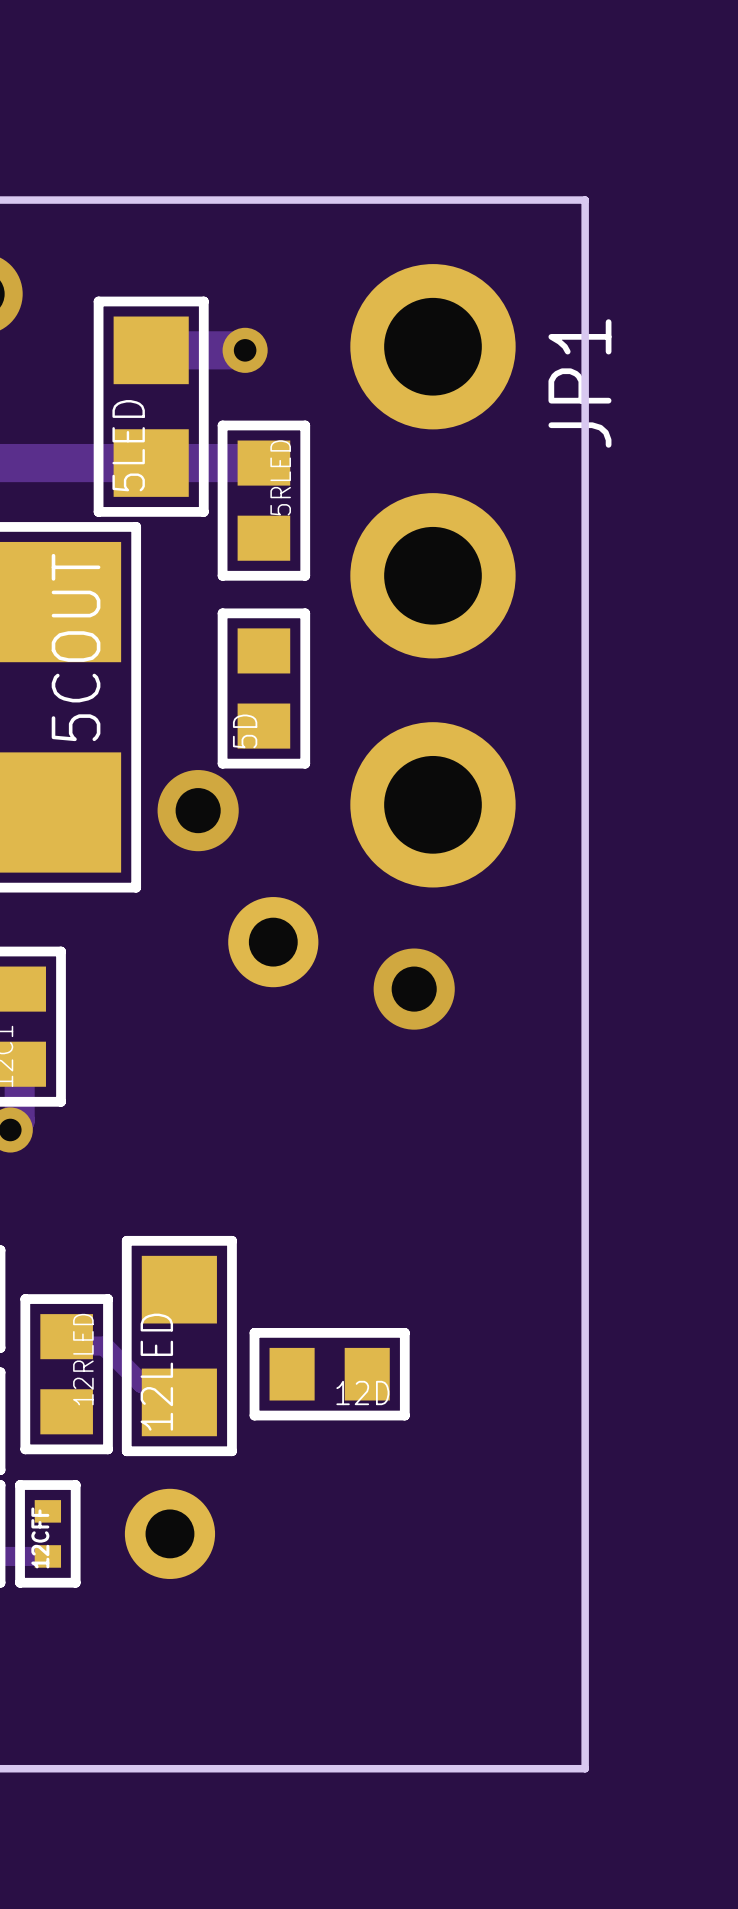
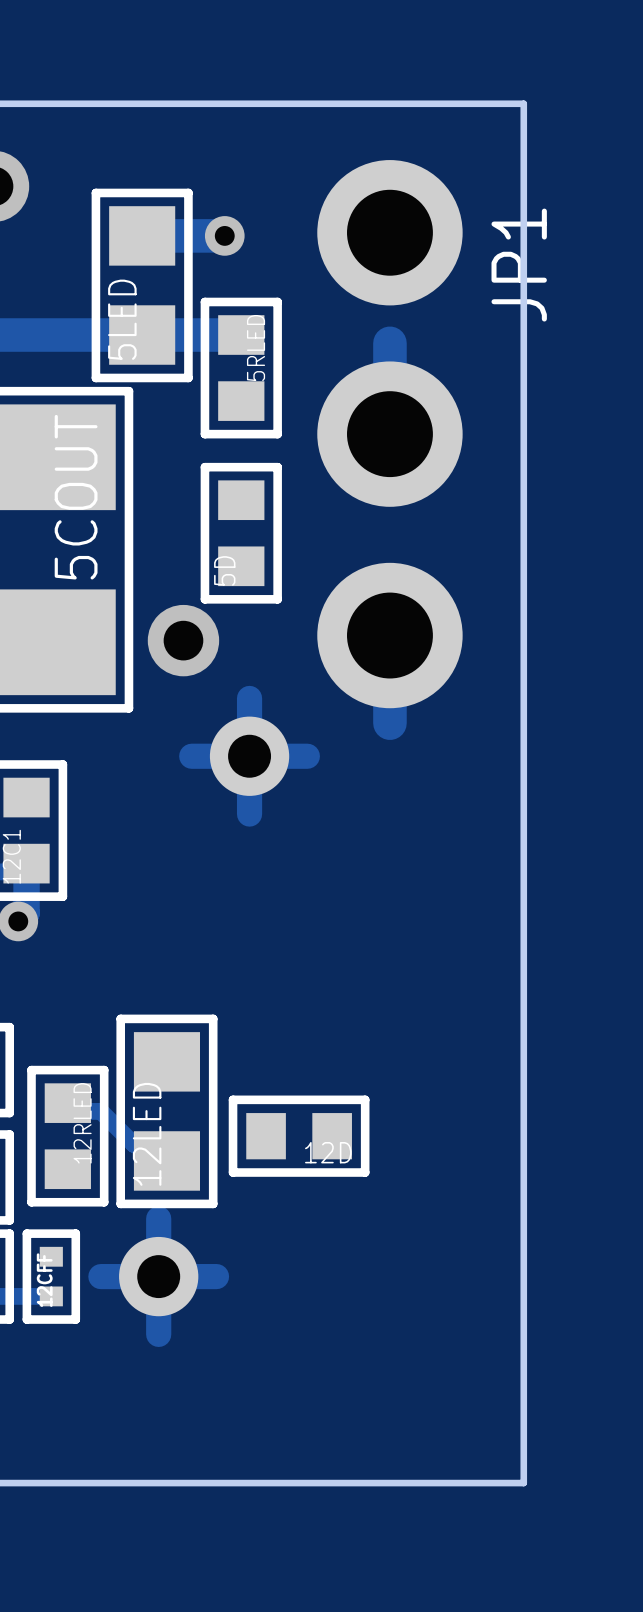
track: none -> (389, 343) (389, 363)
track: none -> (249, 698) (249, 814)
track: none -> (389, 702) (389, 723)
track: none -> (191, 756) (307, 756)
via: (414, 989) -> none
track: none -> (158, 1218) (158, 1334)
track: none -> (100, 1276) (216, 1276)

